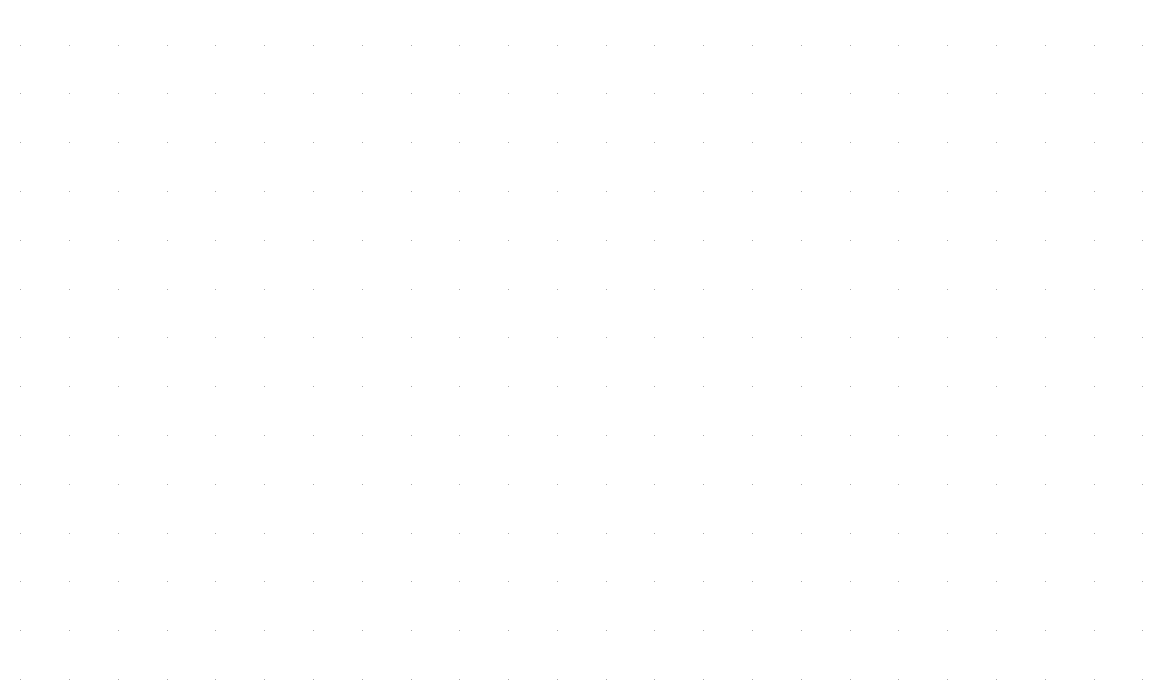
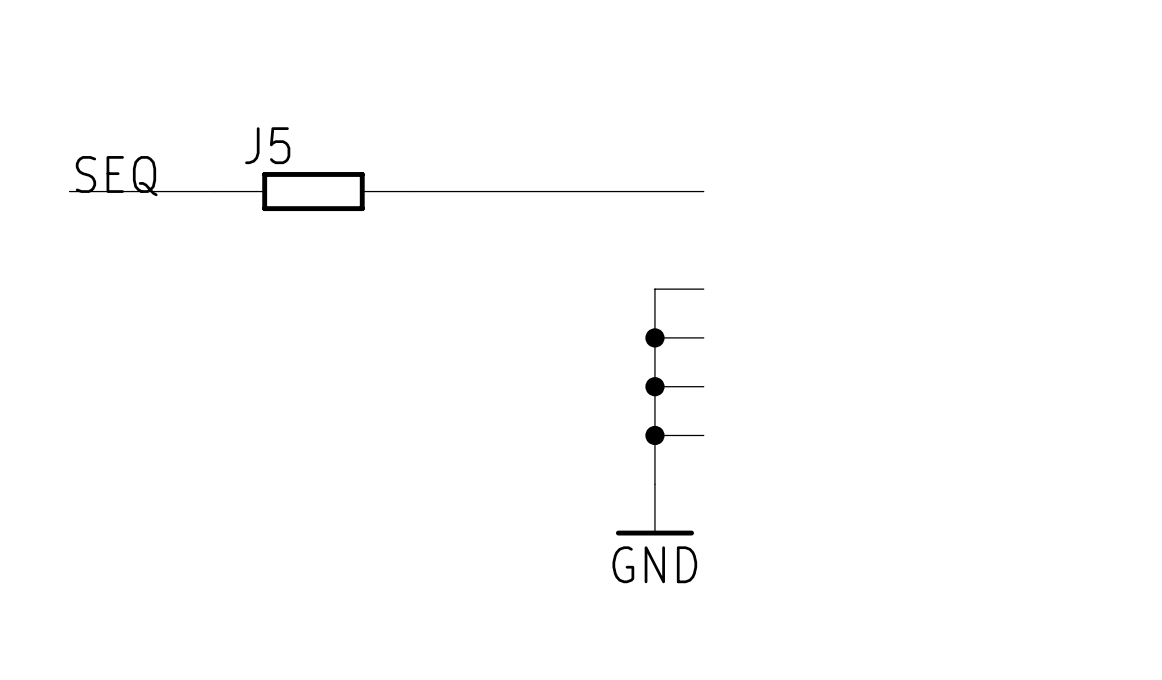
label: none -> SEQ (116, 176)
wire: none -> (69, 191) (215, 191)
J5: none -> (313, 191)
wire: none -> (411, 191) (703, 191)
wire: none -> (703, 289) (654, 289) (654, 484)
wire: none -> (654, 337) (703, 337)
junction: none -> (654, 337)
wire: none -> (654, 386) (703, 386)
junction: none -> (654, 386)
wire: none -> (654, 435) (703, 435)
junction: none -> (654, 435)
power symbol: none -> GND (654, 509)

